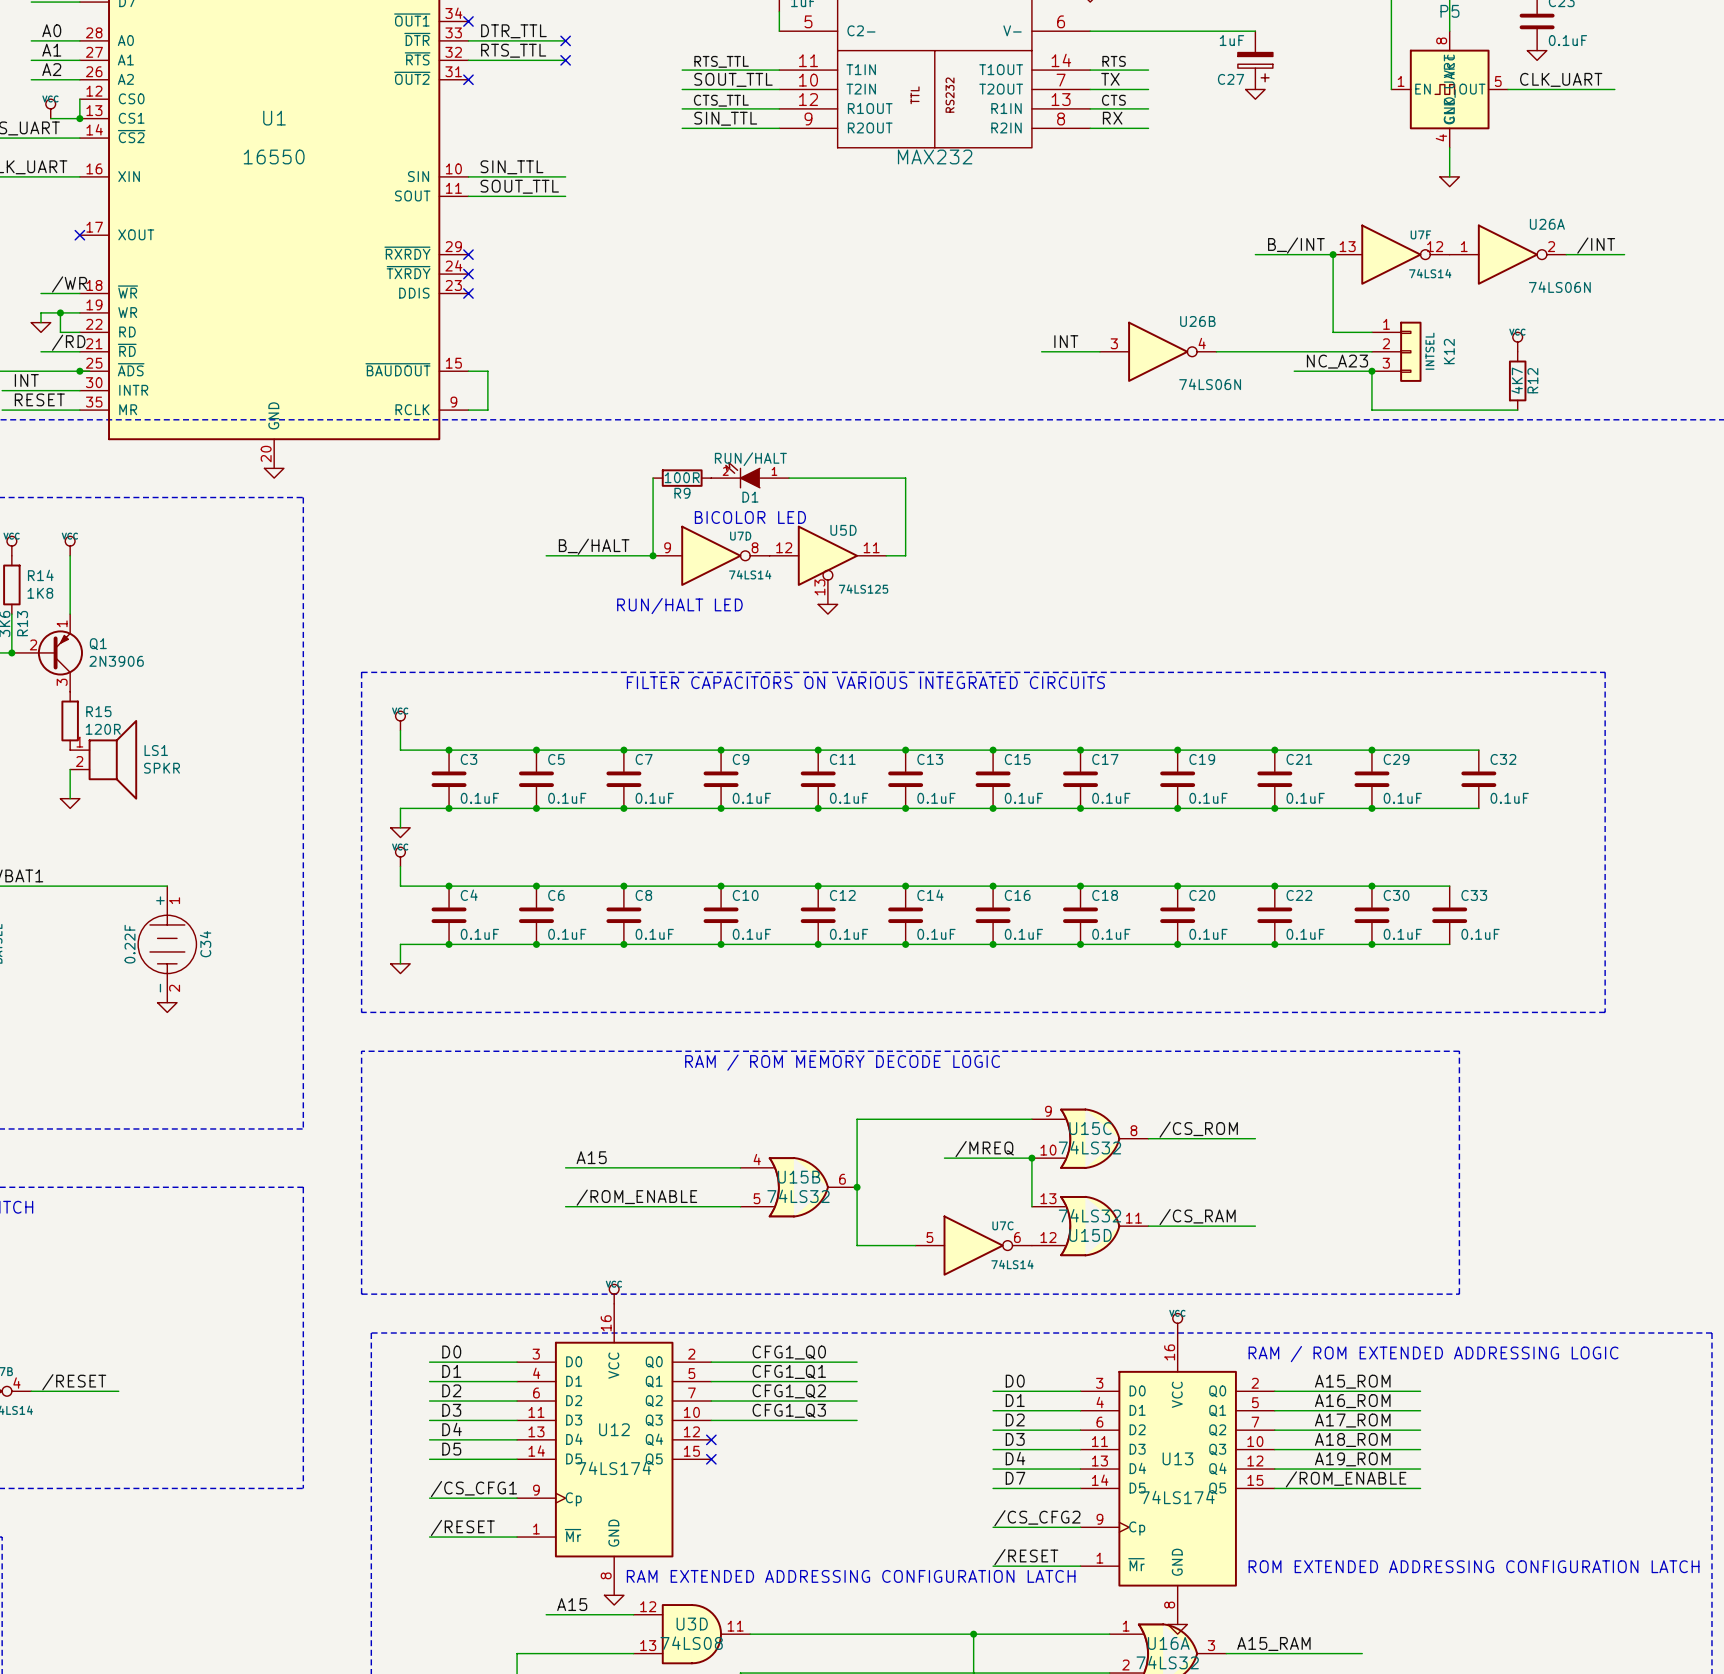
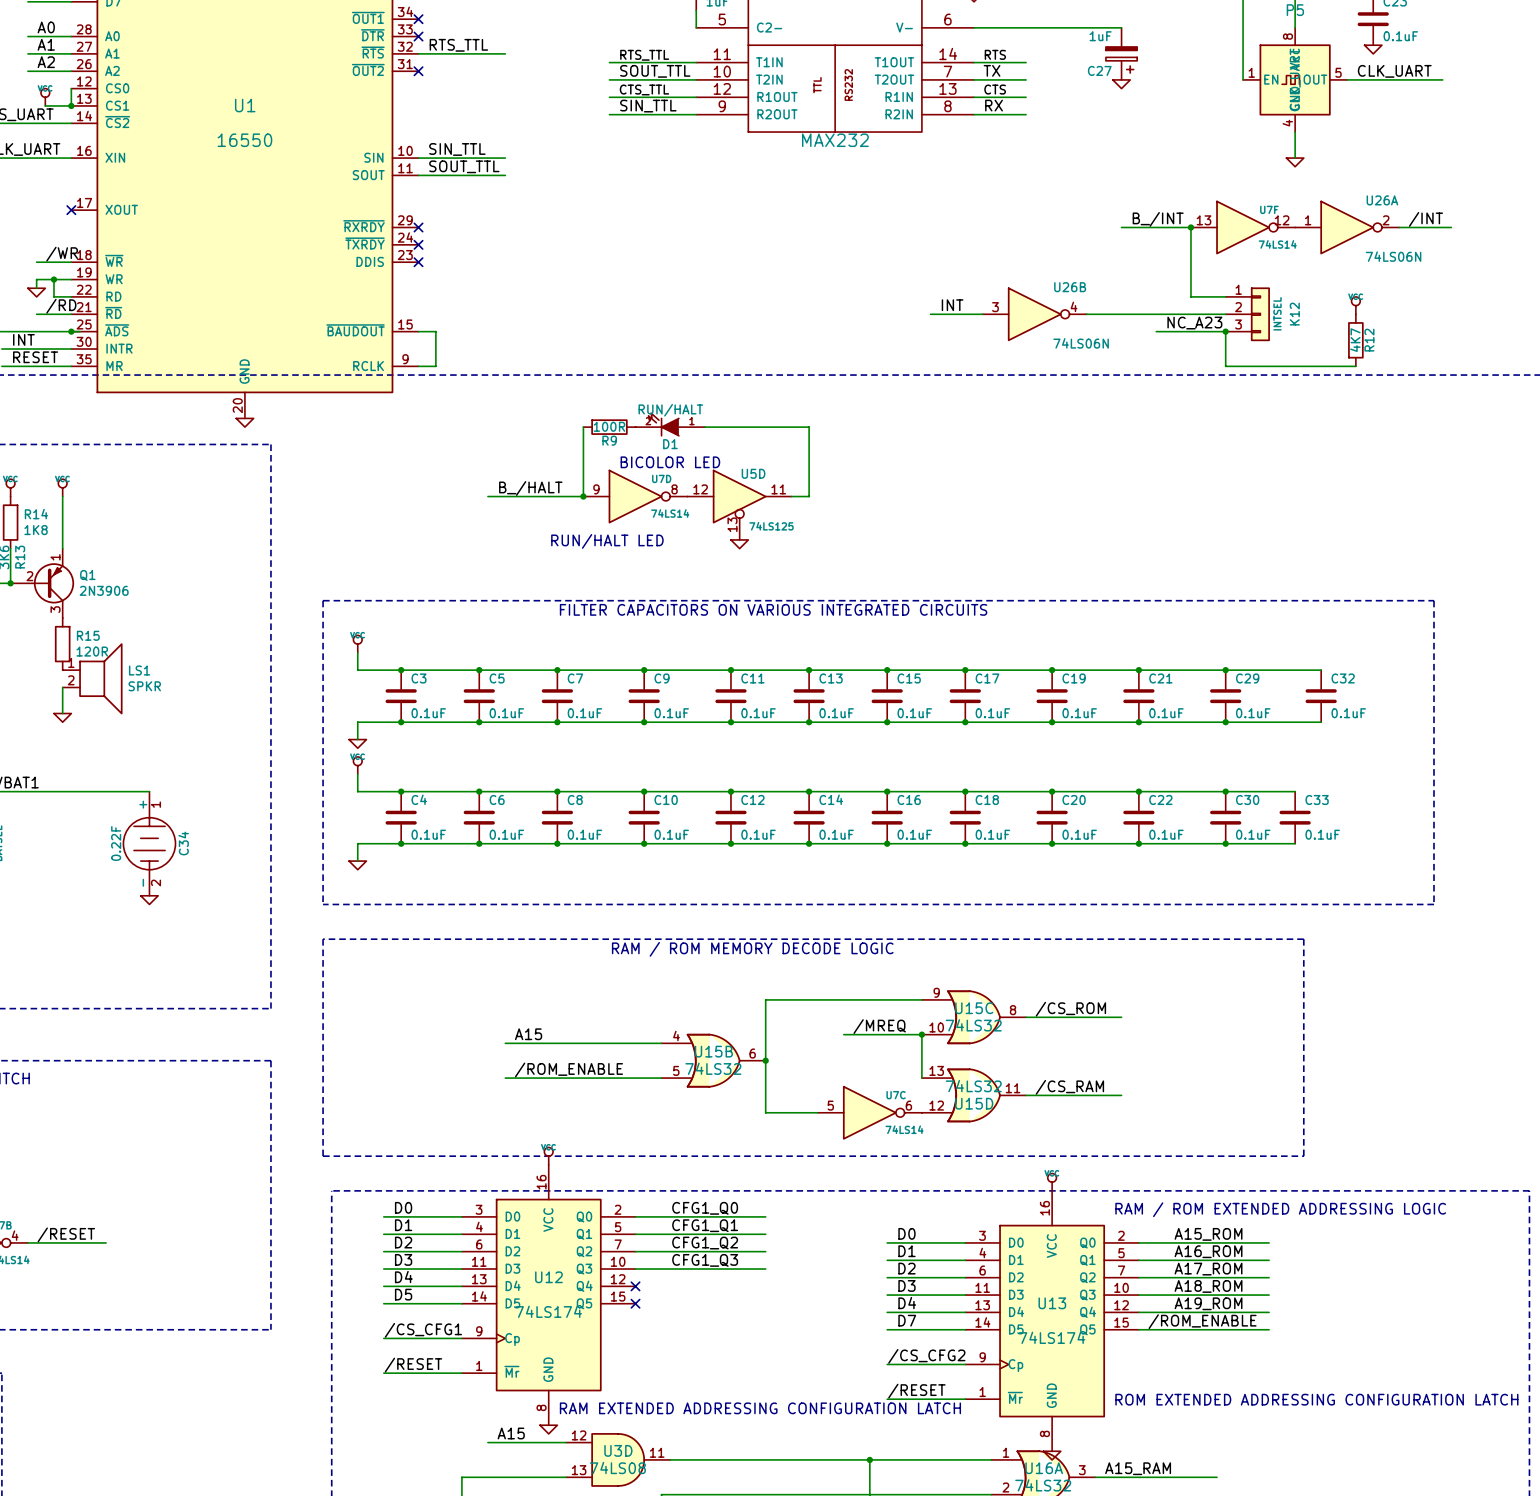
label: DTR_TTL (513, 31) -> none
wire: (468, 40) (565, 40) -> none
no-connect mark: none -> (418, 36)
no-connect mark: (565, 40) -> none
no-connect mark: (565, 60) -> none

